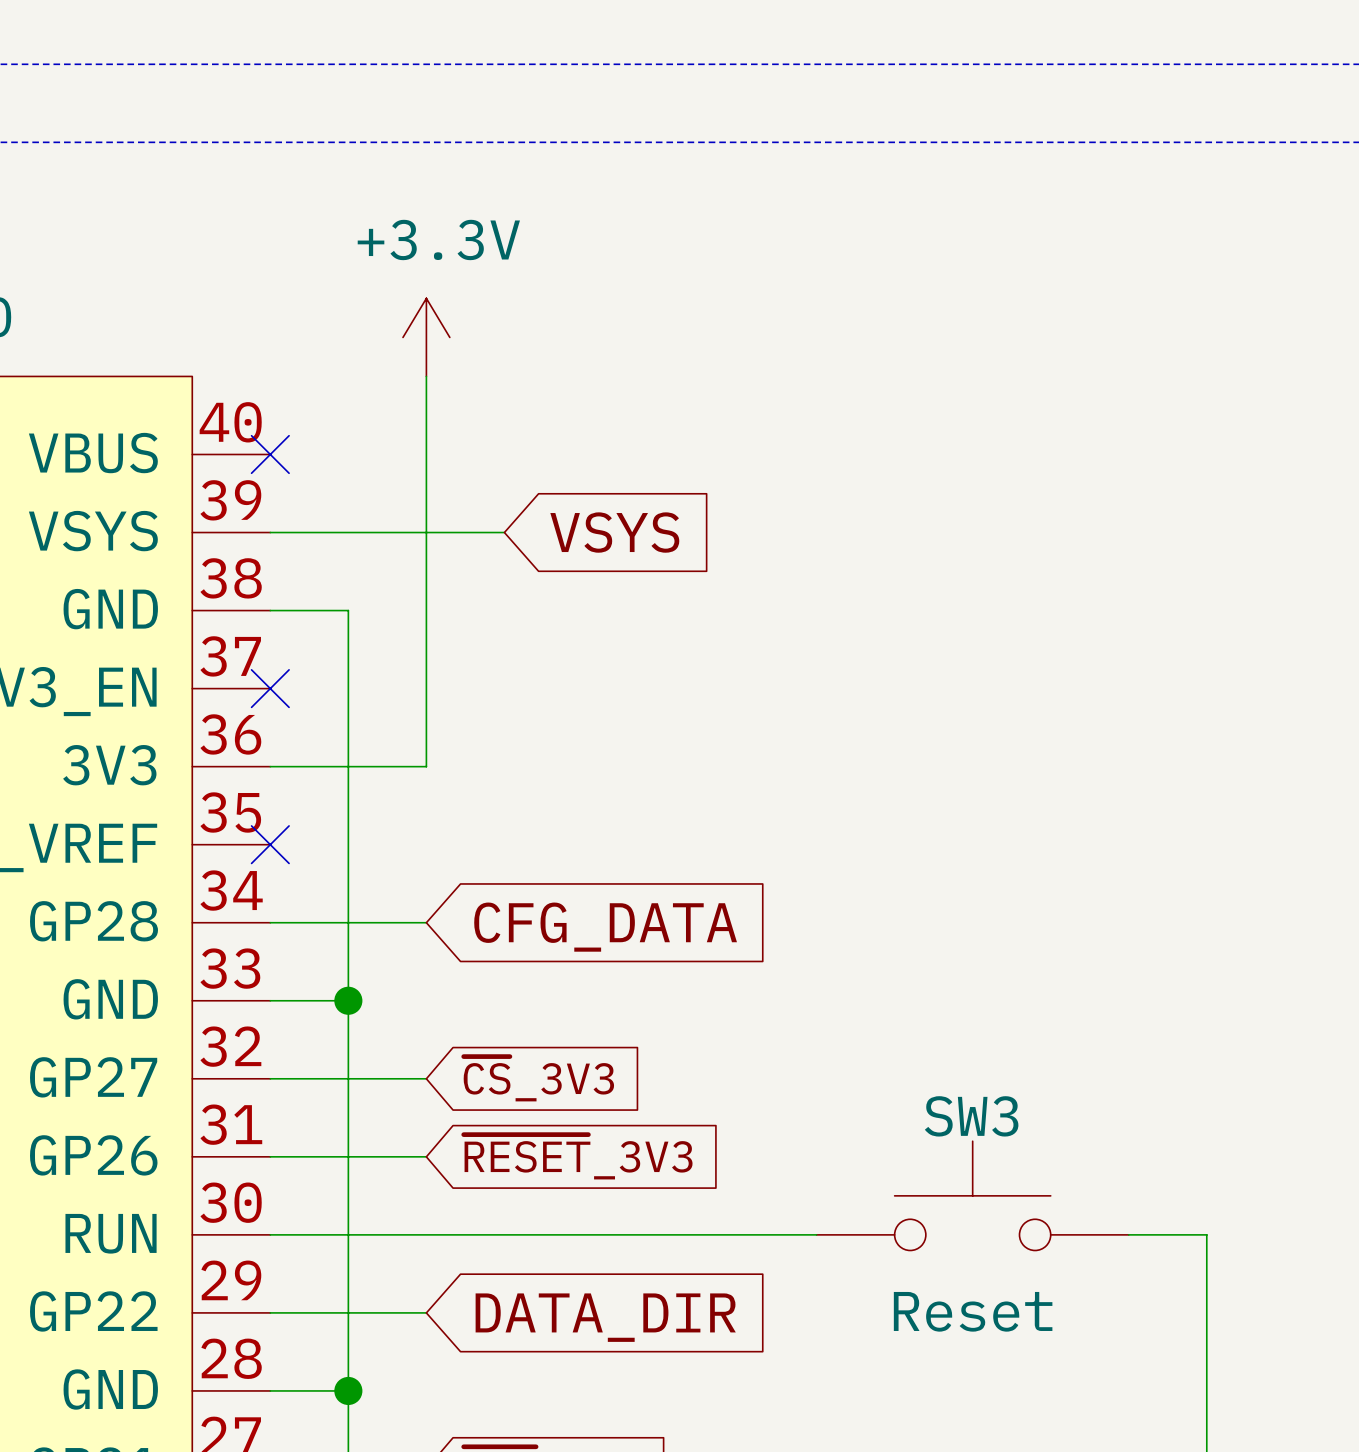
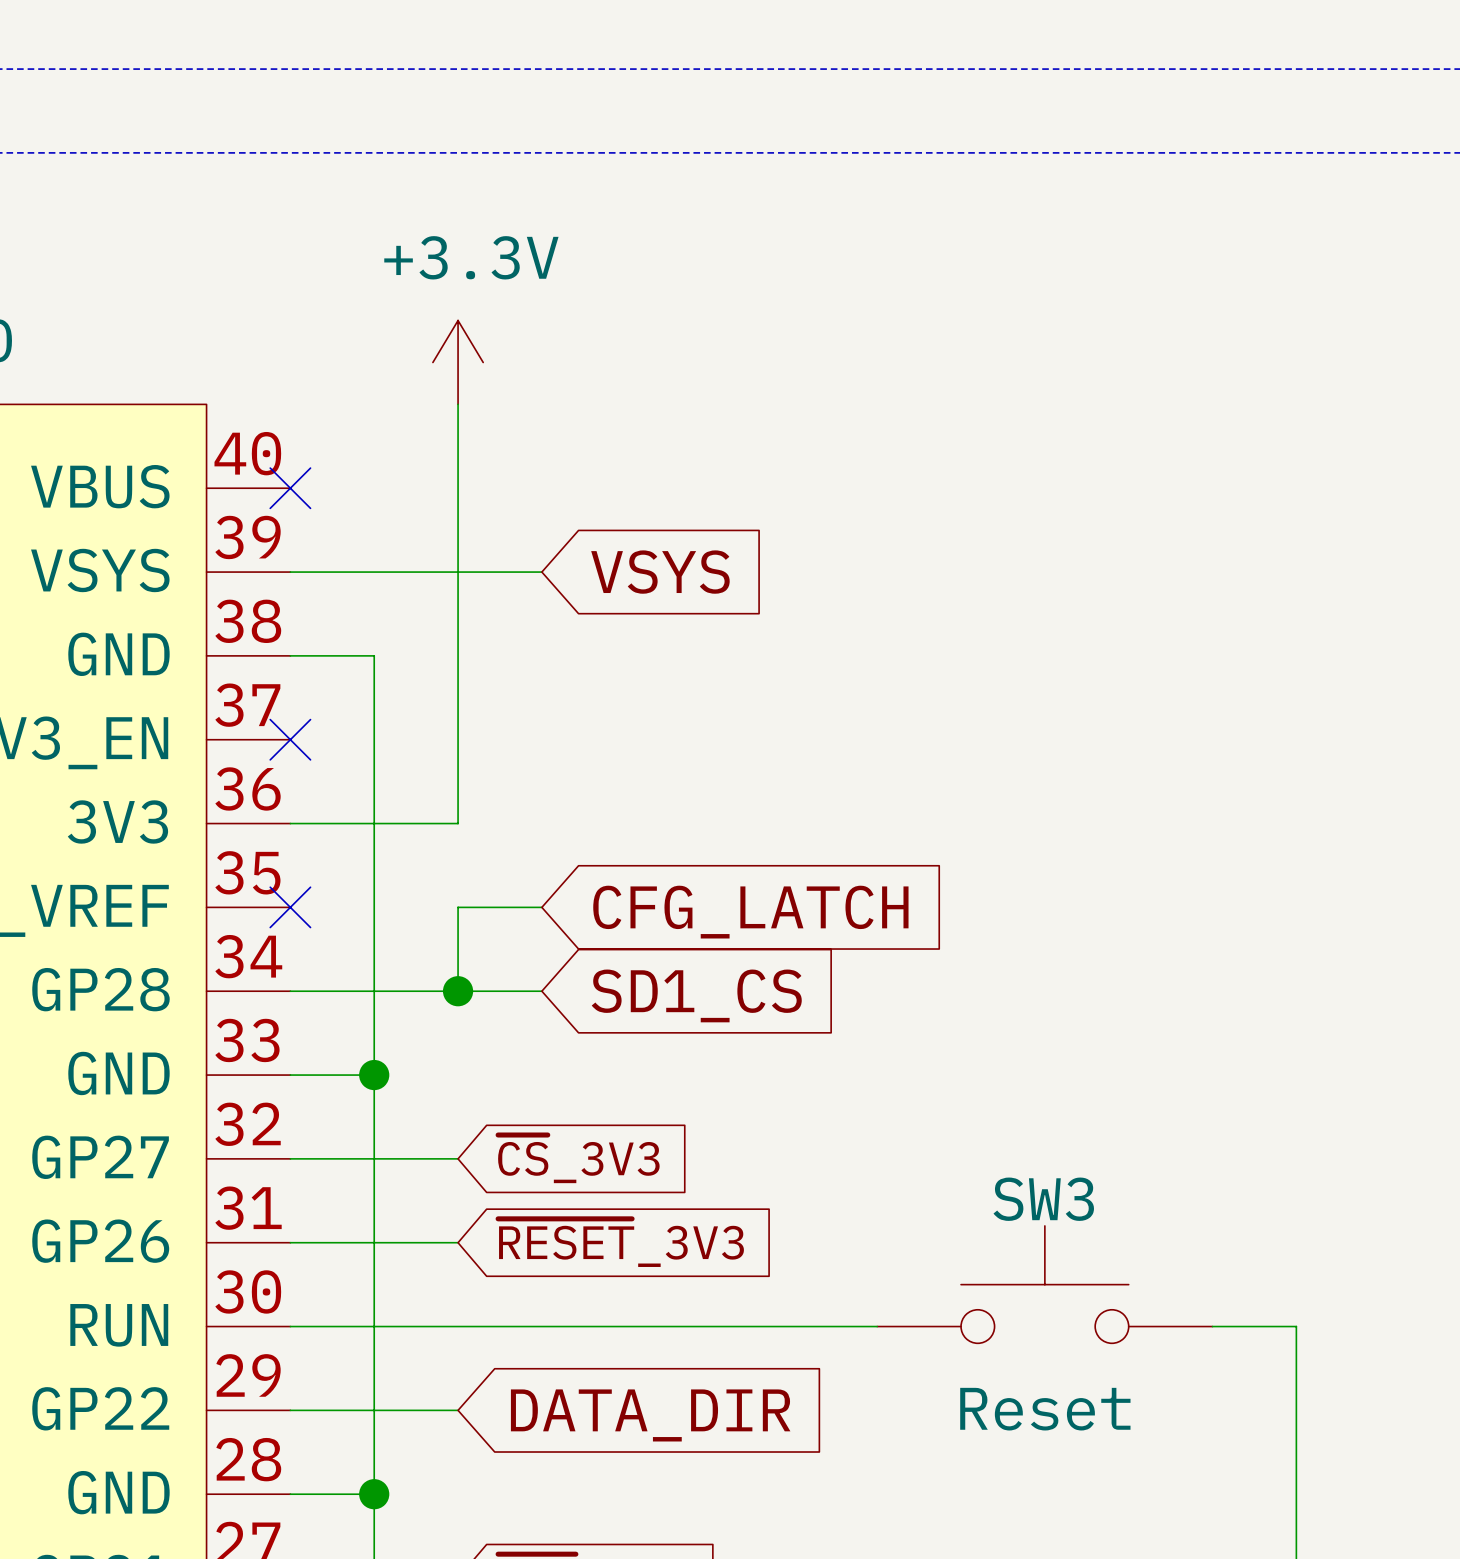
wire: none -> (541, 907) (458, 907) (458, 991) (541, 991)
junction: none -> (458, 991)
global label: CFG_DATA (605, 927) -> CFG_LATCH (750, 912)
global label: none -> SD1_CS (696, 995)

